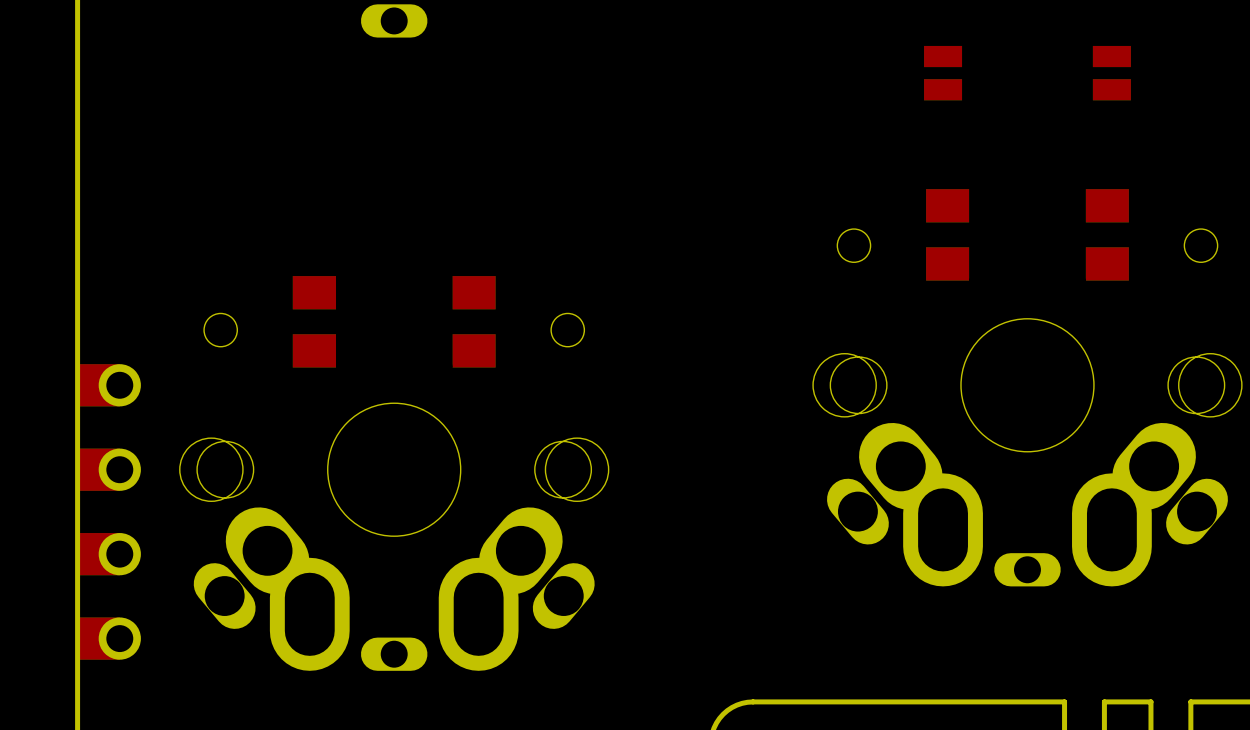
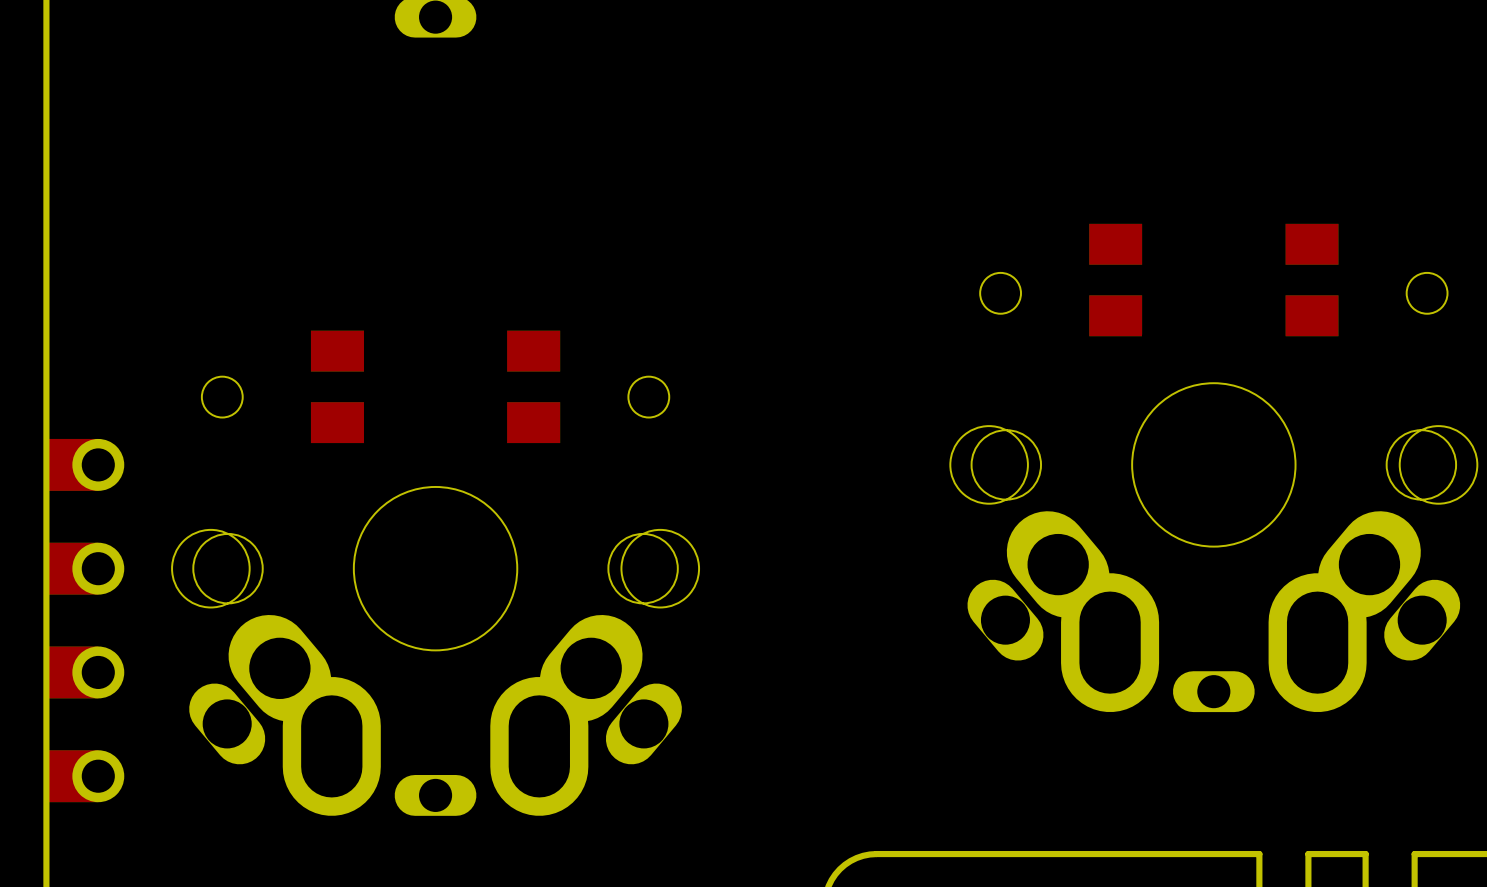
part: (943, 73) -> none
part: (1111, 73) -> none

